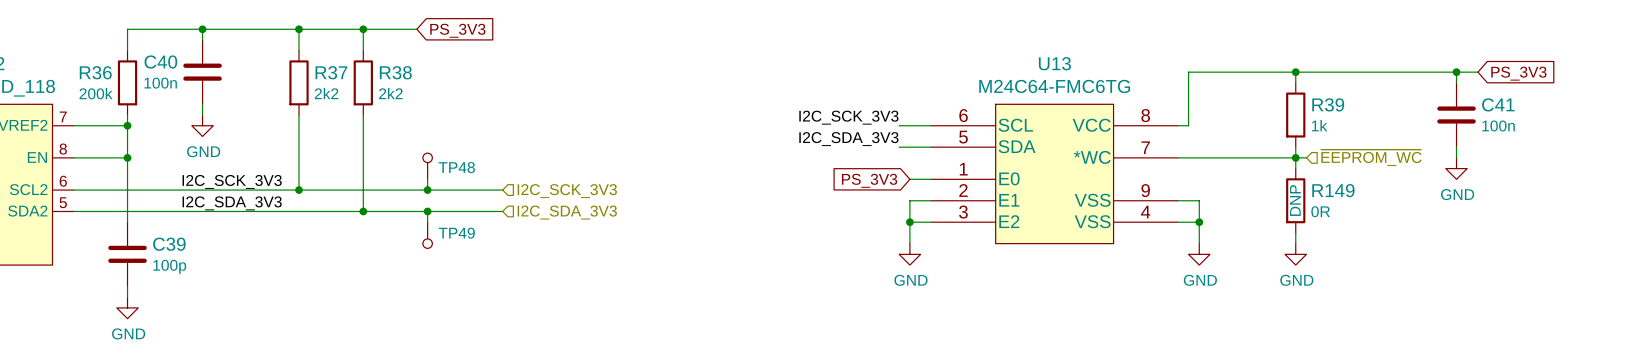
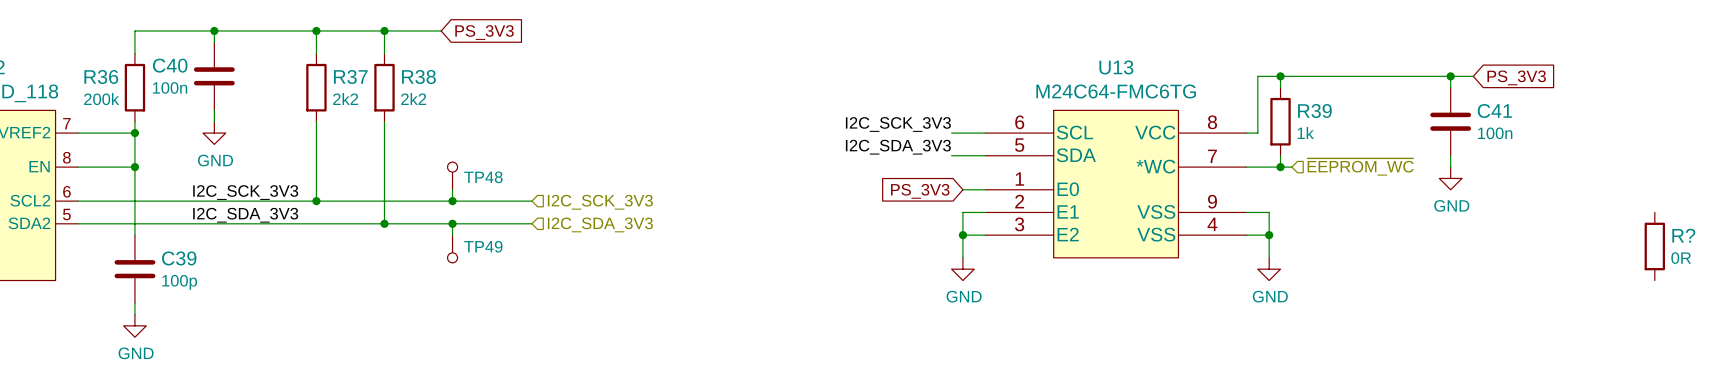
junction: none -> (1280, 76)
wire: (1295, 72) (1295, 82) -> (1280, 76) (1280, 87)
junction: (1295, 72) -> none
junction: none -> (1450, 76)
wire: (1392, 72) (1477, 72) -> none
wire: (1456, 72) (1456, 82) -> (1450, 76) (1450, 87)
junction: (1456, 72) -> none
global label position: PS_3V3 (1518, 73) -> PS_3V3 (1516, 77)
R39 position: (1295, 115) -> (1280, 121)
C41 position: (1456, 115) -> (1450, 121)
wire: (1295, 147) (1295, 168) -> none
wire: (1456, 147) (1456, 157) -> (1450, 155) (1450, 167)
junction: none -> (1280, 167)
wire: (1220, 157) (1306, 157) -> none
junction: (1295, 157) -> none
hierarchical label position: ~{EEPROM_WC} (1371, 157) -> ~{EEPROM_WC} (1360, 167)
power symbol: none -> GND (1450, 178)
power symbol: GND (1456, 168) -> none
R149: (1295, 200) -> none
wire: (1295, 232) (1295, 243) -> (1280, 155) (1280, 167)
R?: none -> (1654, 246)
power symbol: GND (1295, 254) -> none

